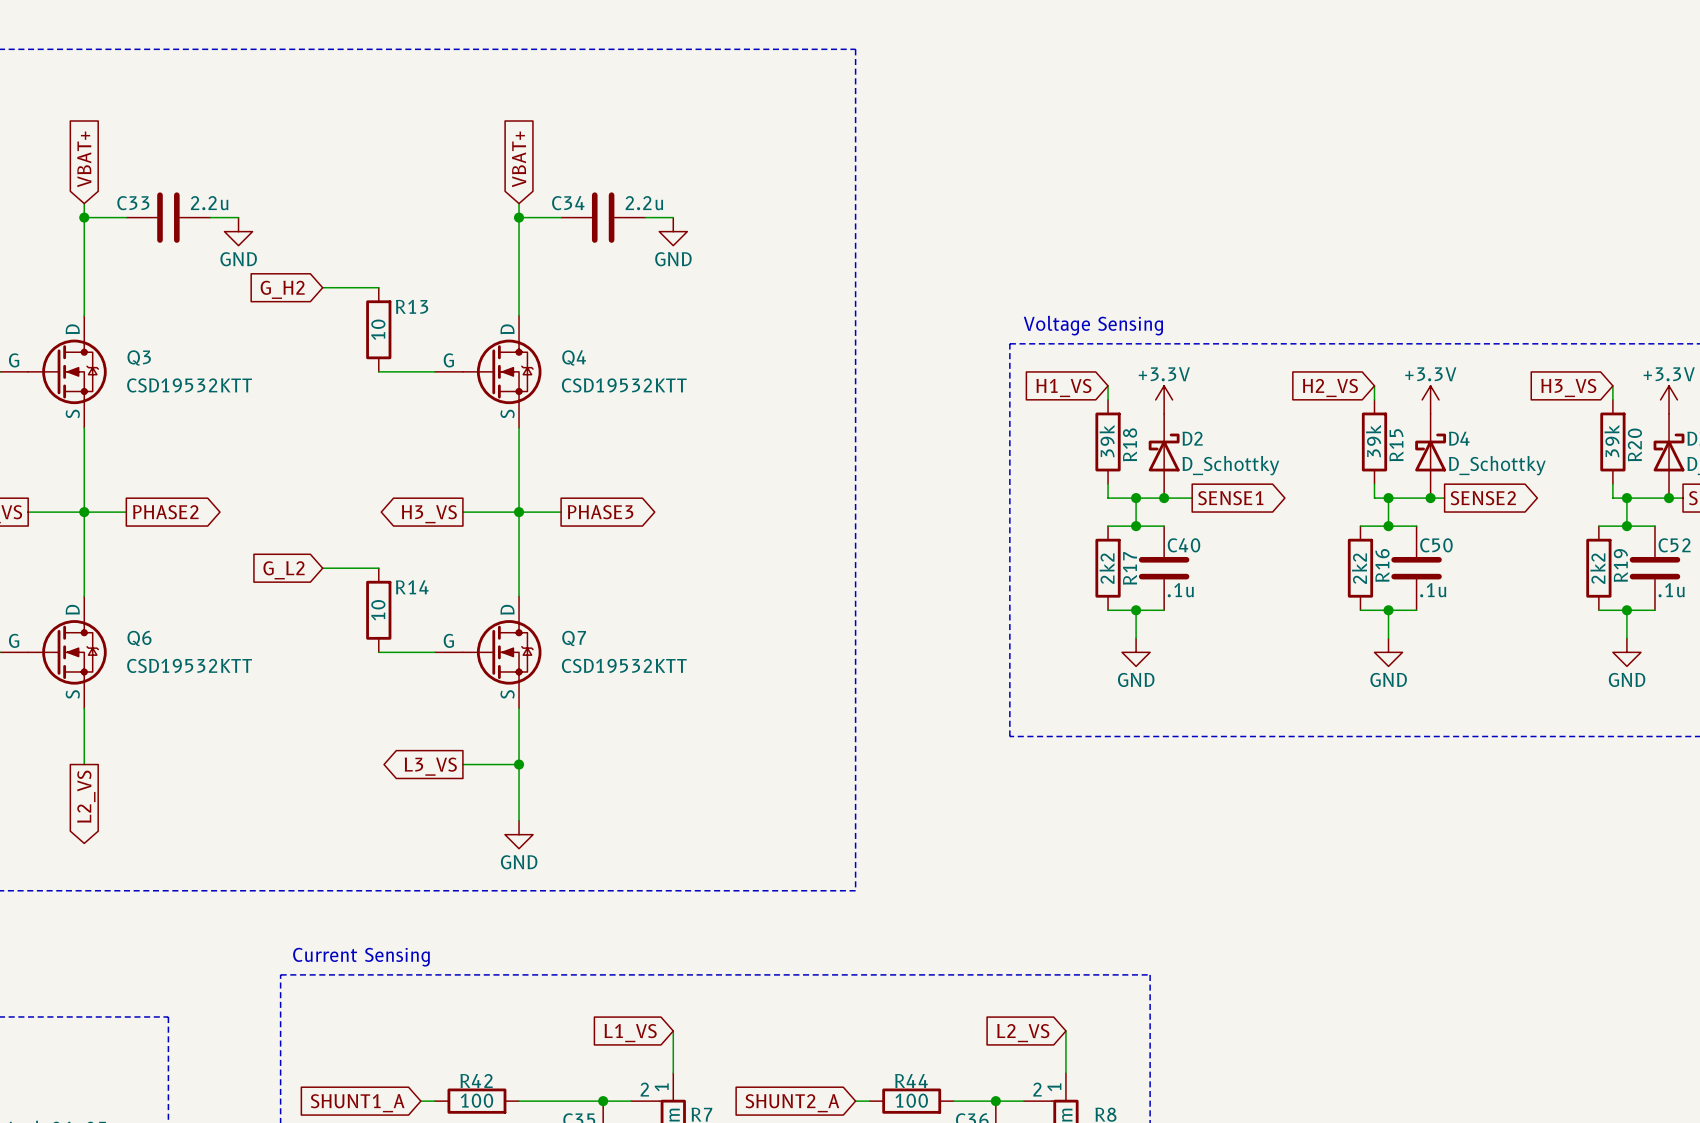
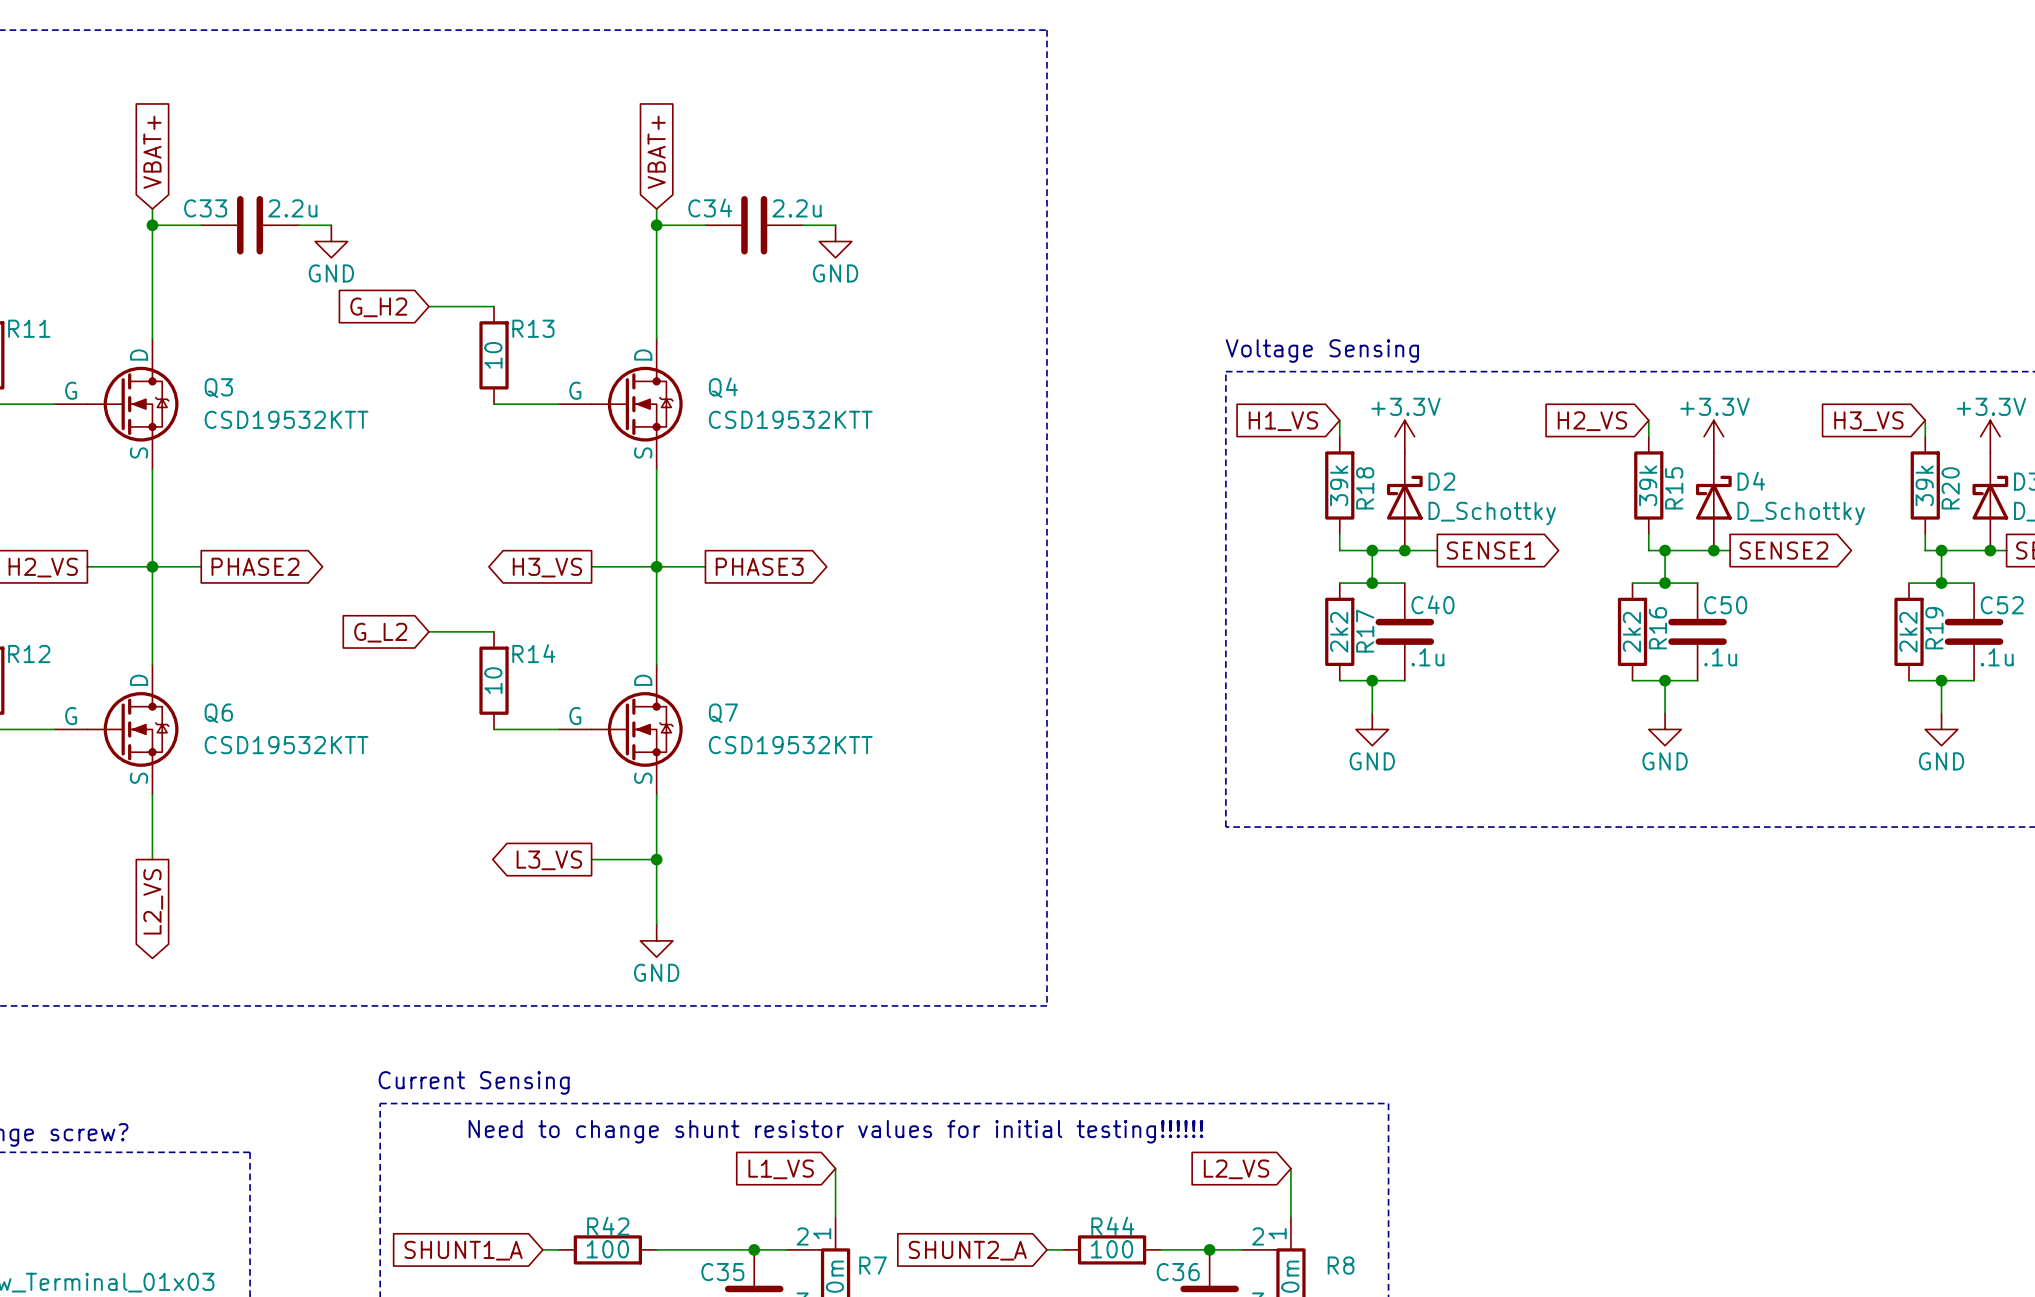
text: none -> Need to change shunt resistor values for initial testing!!!!!! (835, 1131)

